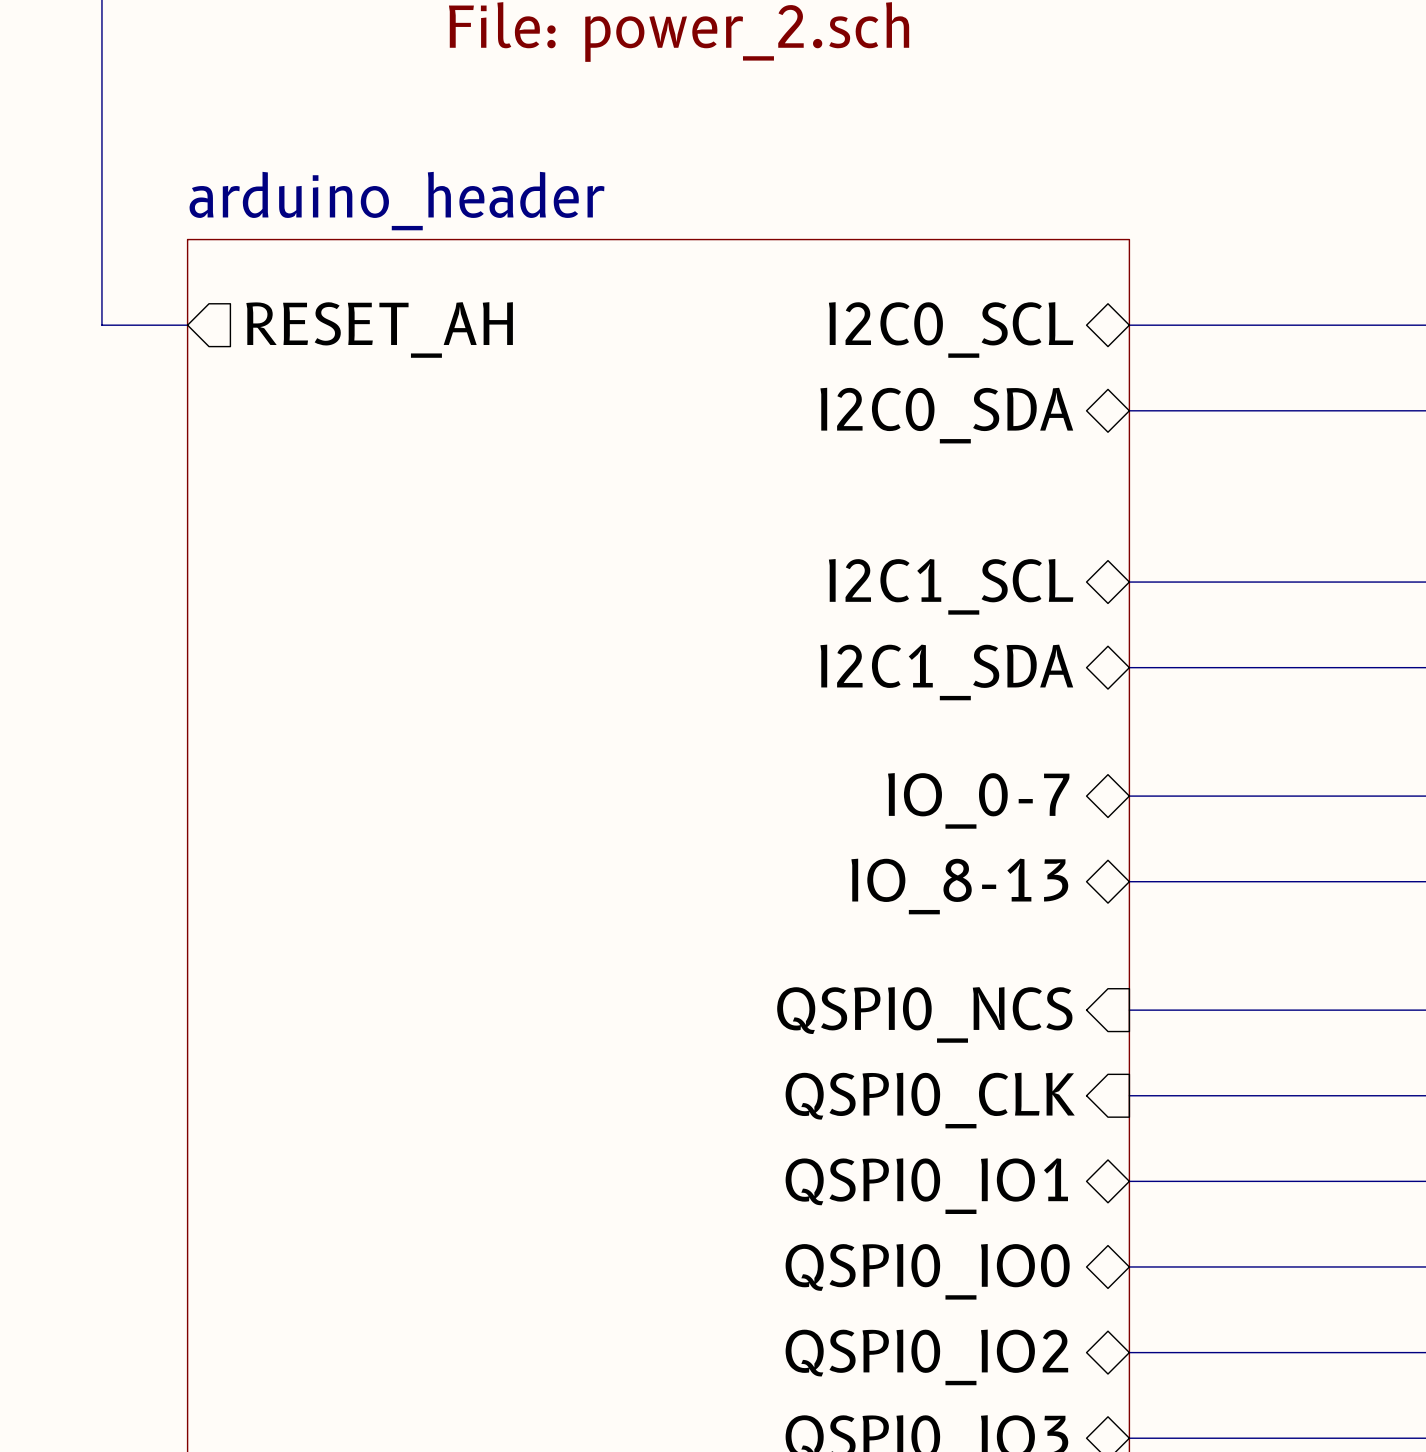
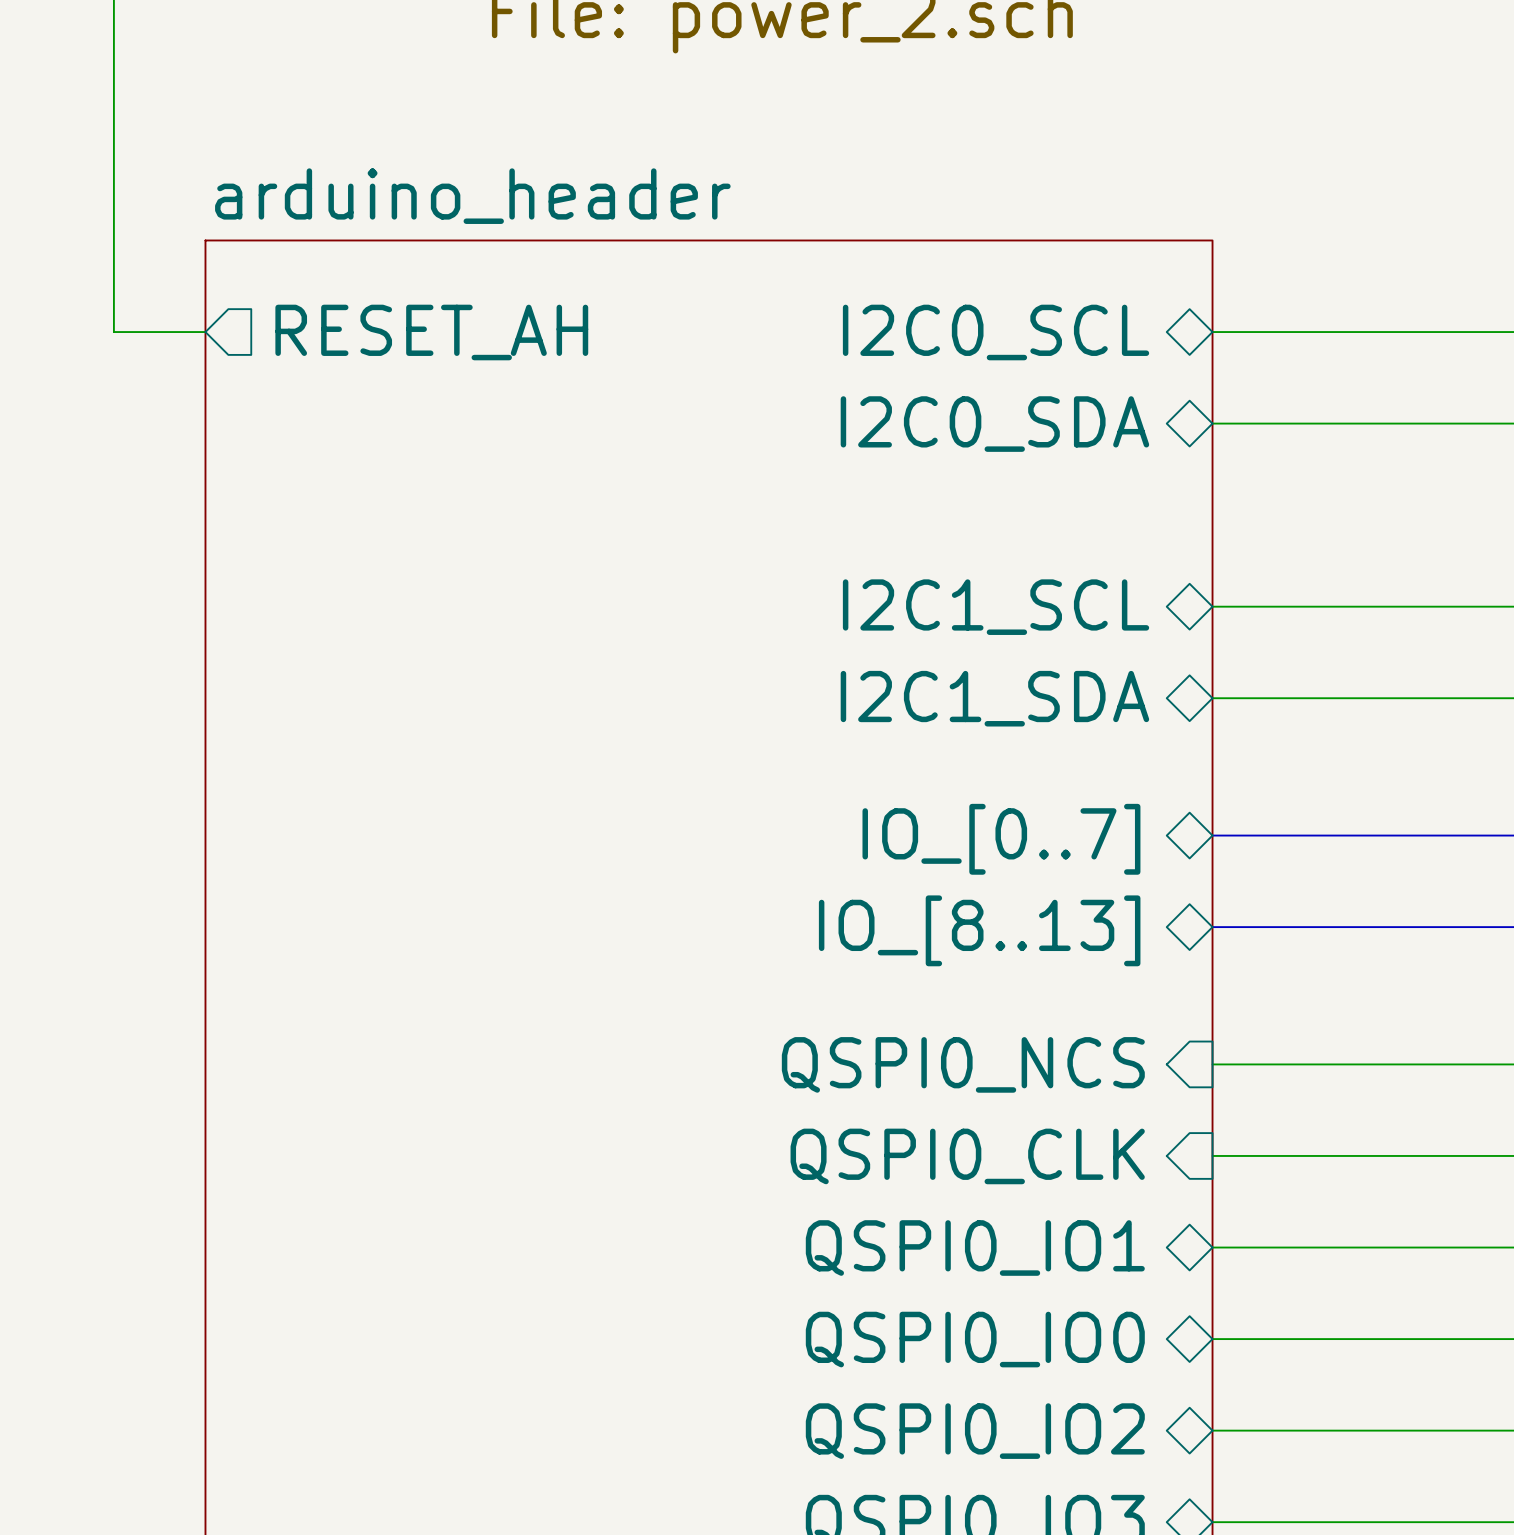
sheet pin: IO_0-7 (978, 800) -> IO_[0..7] (1001, 839)
sheet pin: IO_8-13 (959, 886) -> IO_[8..13] (979, 930)

